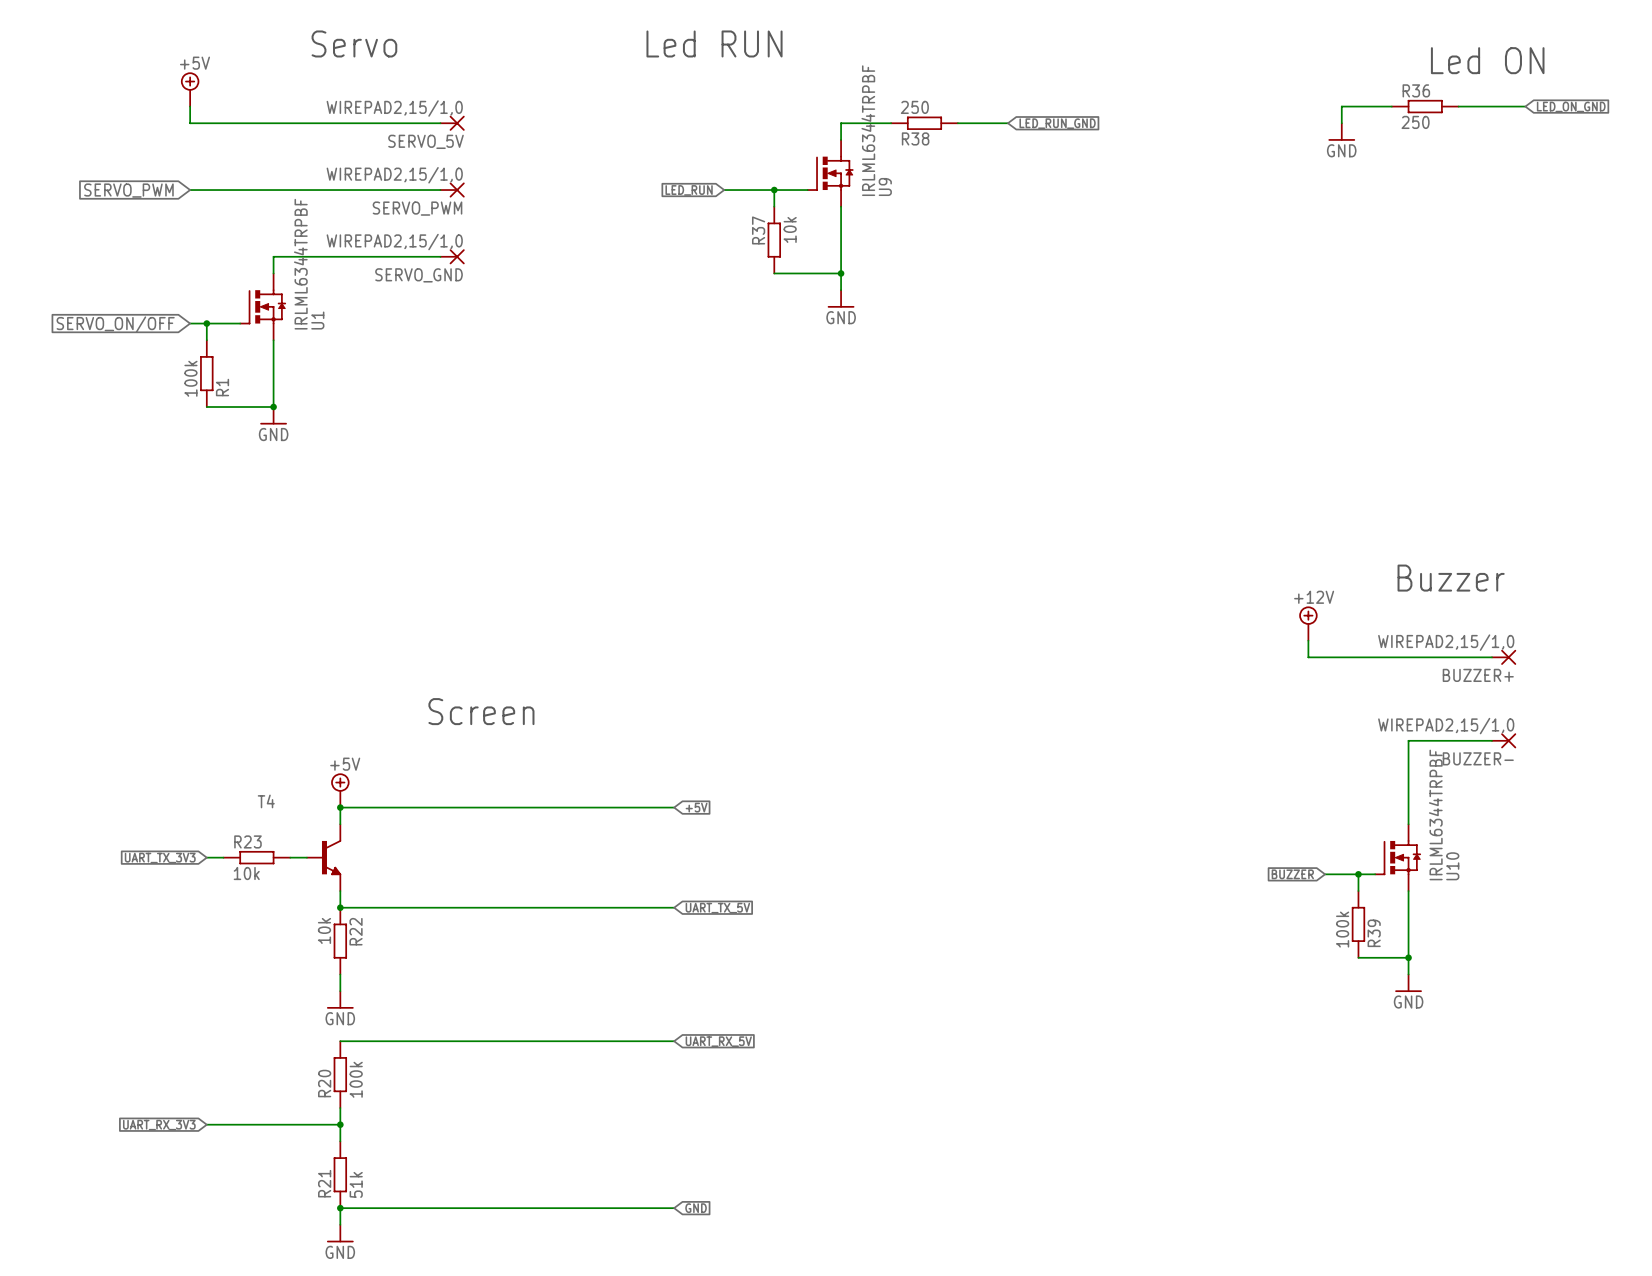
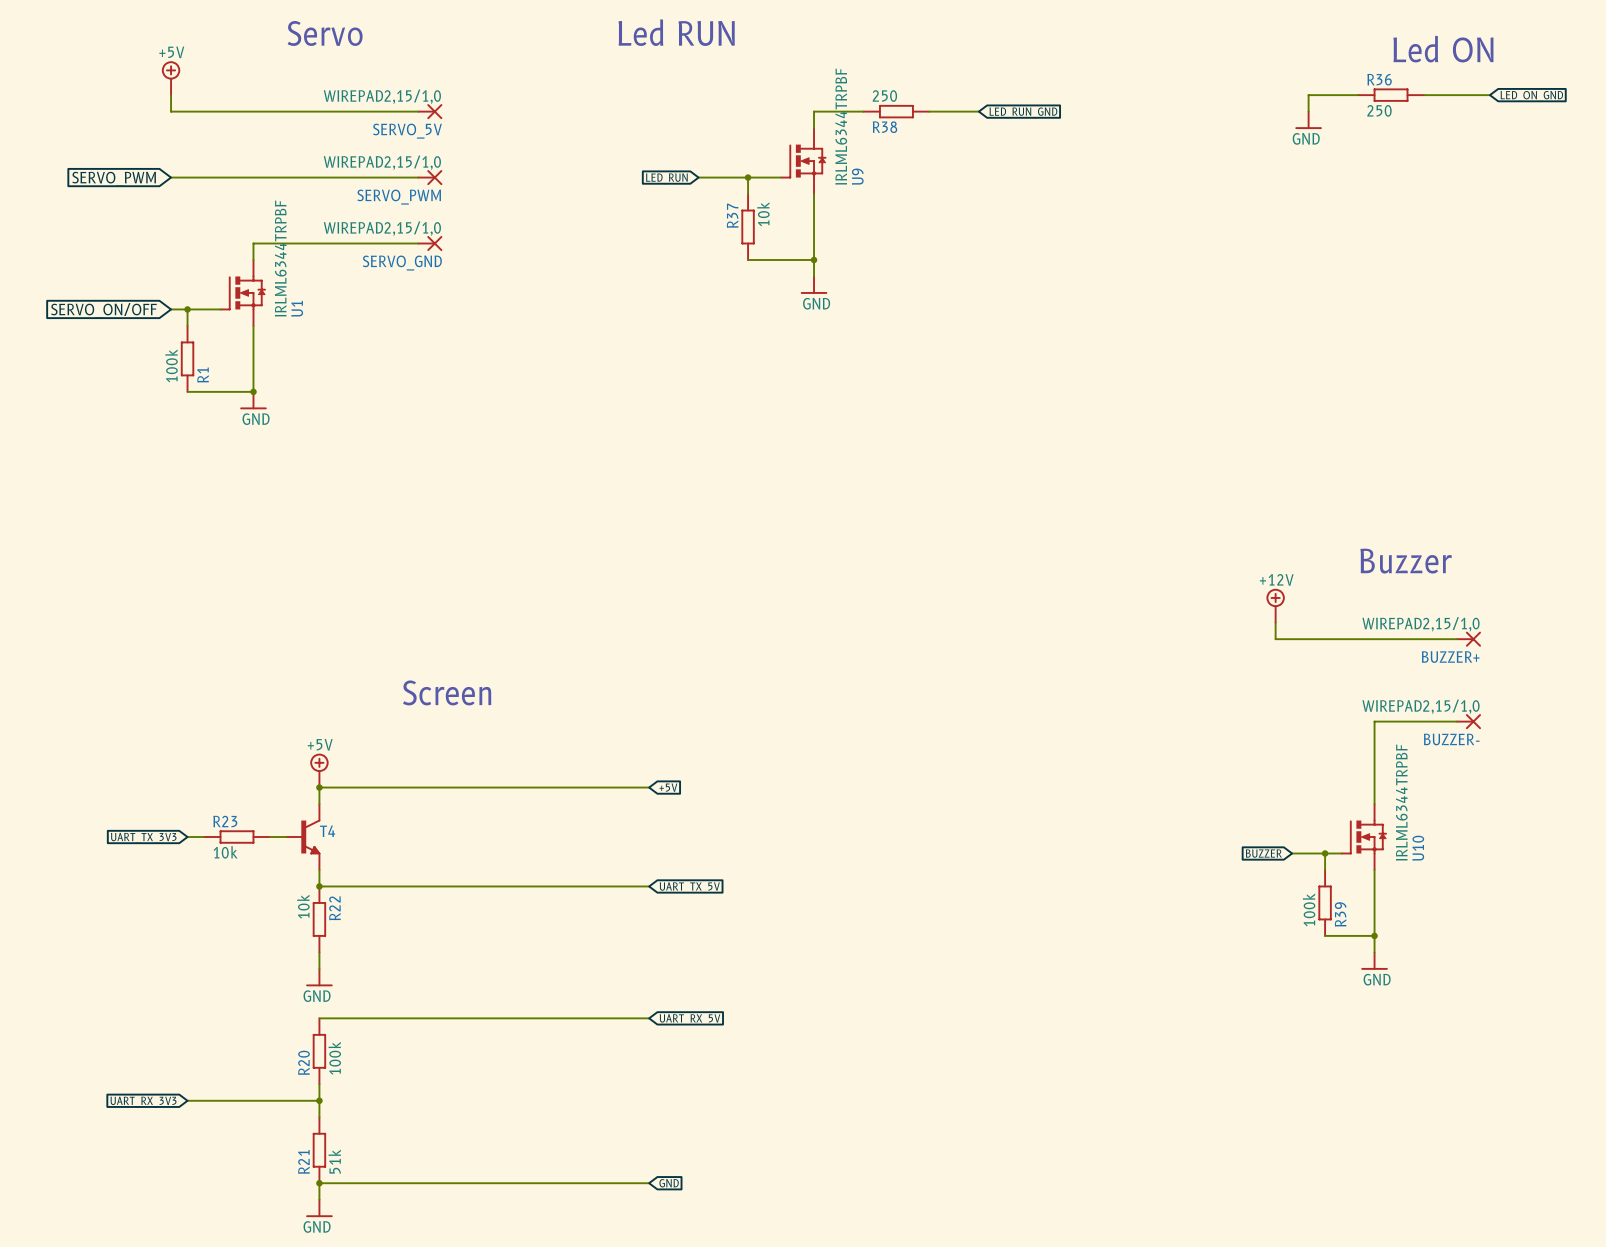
T4 name position: T4 (266, 801) -> T4 (327, 831)

